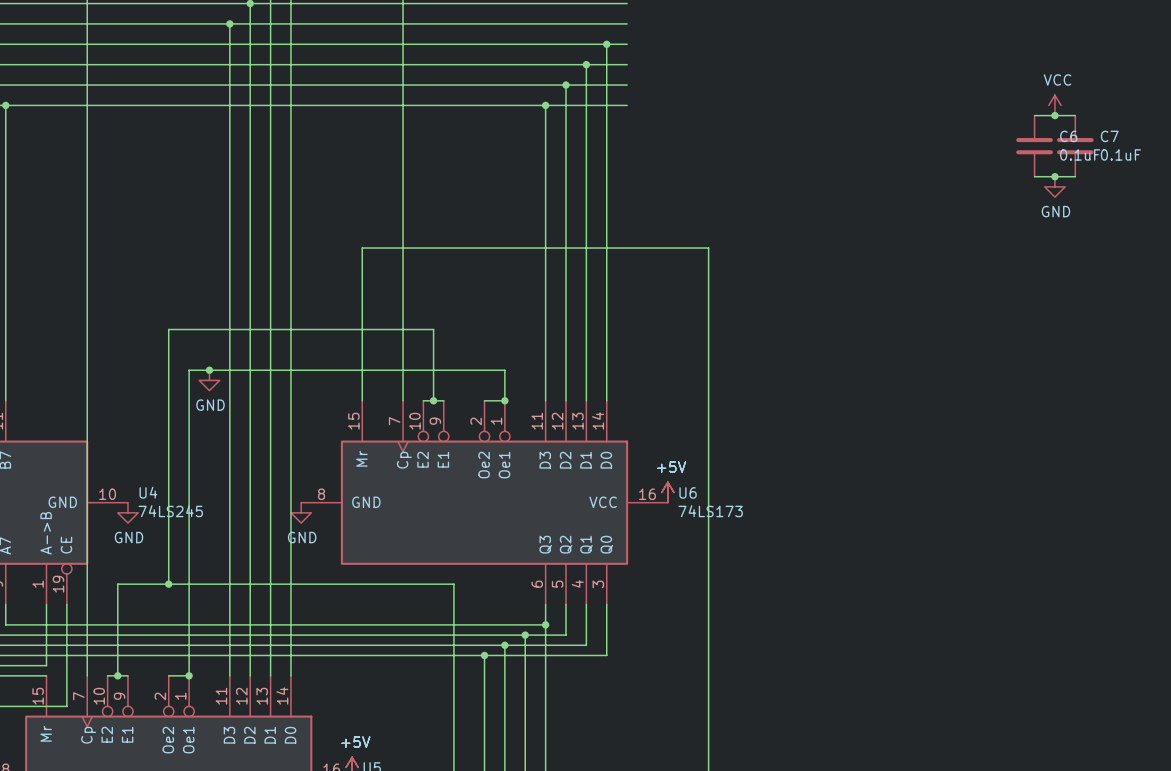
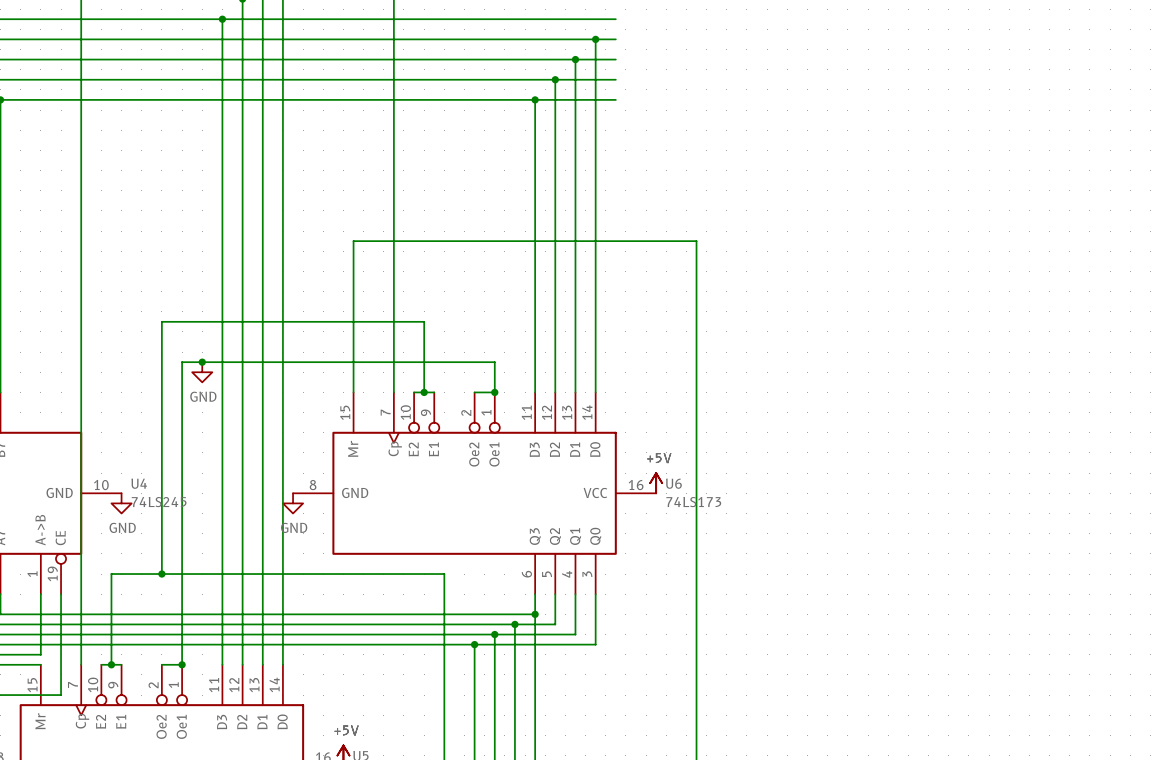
power symbol: VCC (1054, 105) -> none
wire: (1034, 115) (1075, 115) -> none
junction: (1054, 115) -> none
C6: 0.1uF (1034, 146) -> none
C7: 0.1uF (1075, 146) -> none
wire: (1034, 176) (1075, 176) -> none
junction: (1054, 176) -> none
power symbol: GND (1054, 186) -> none

